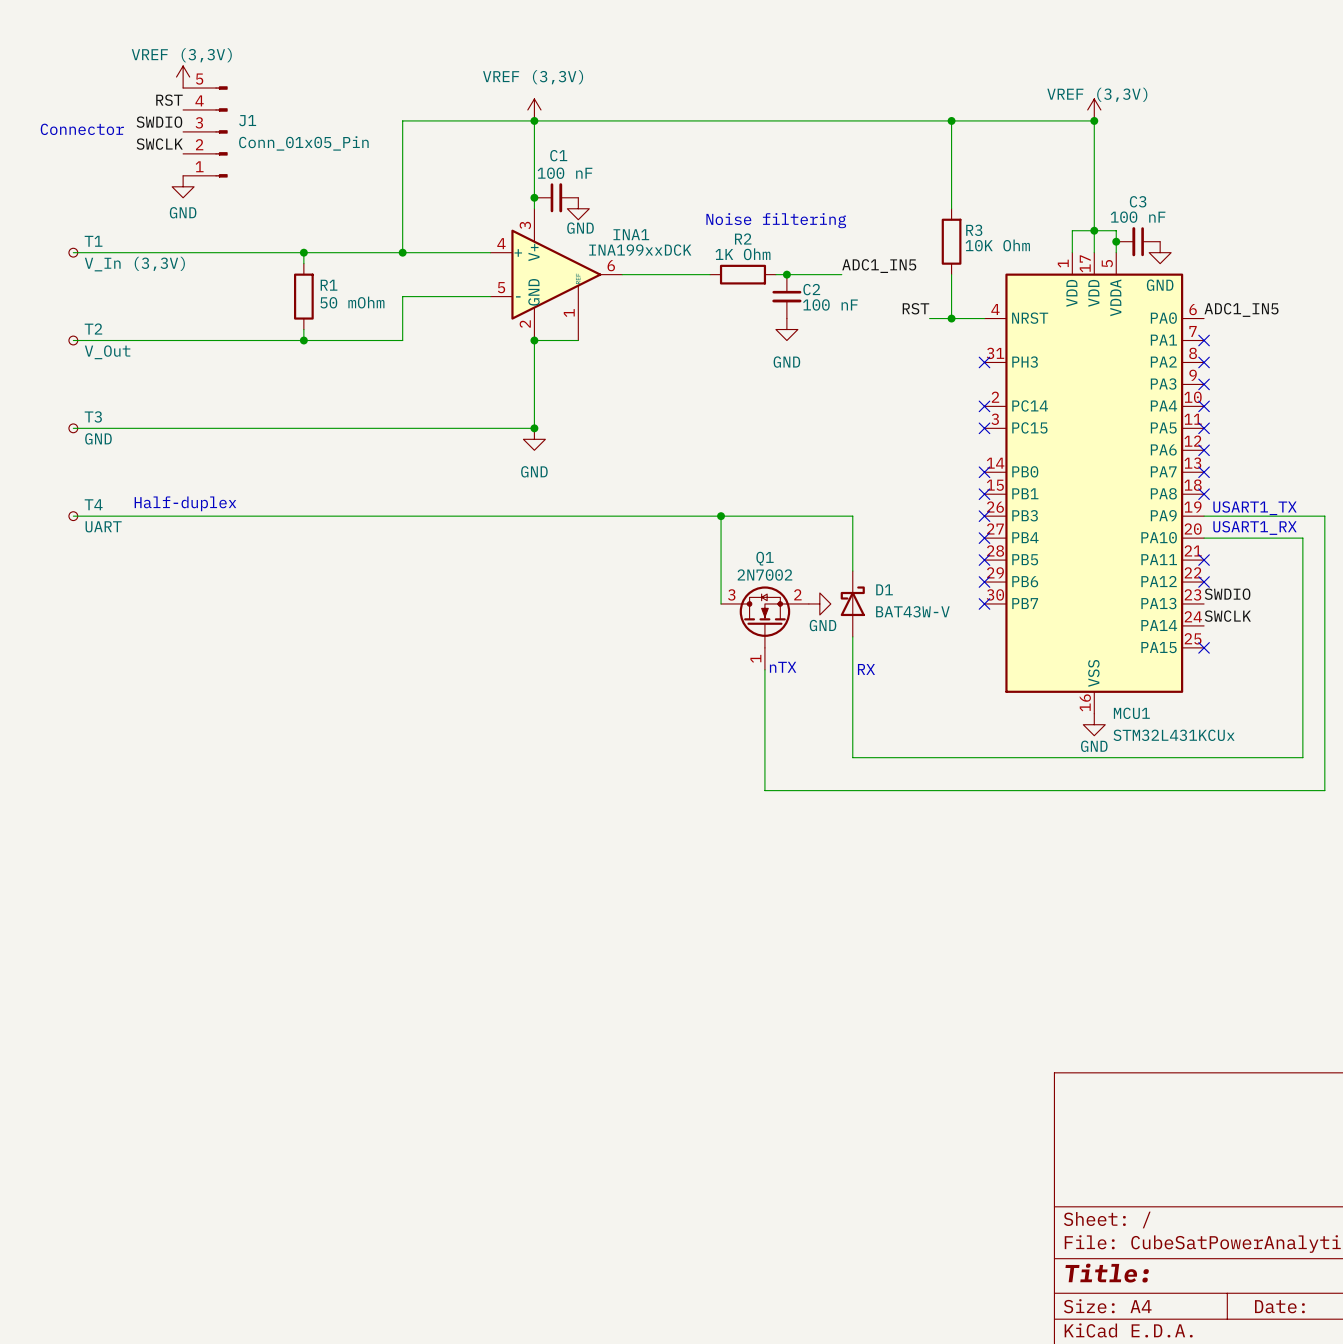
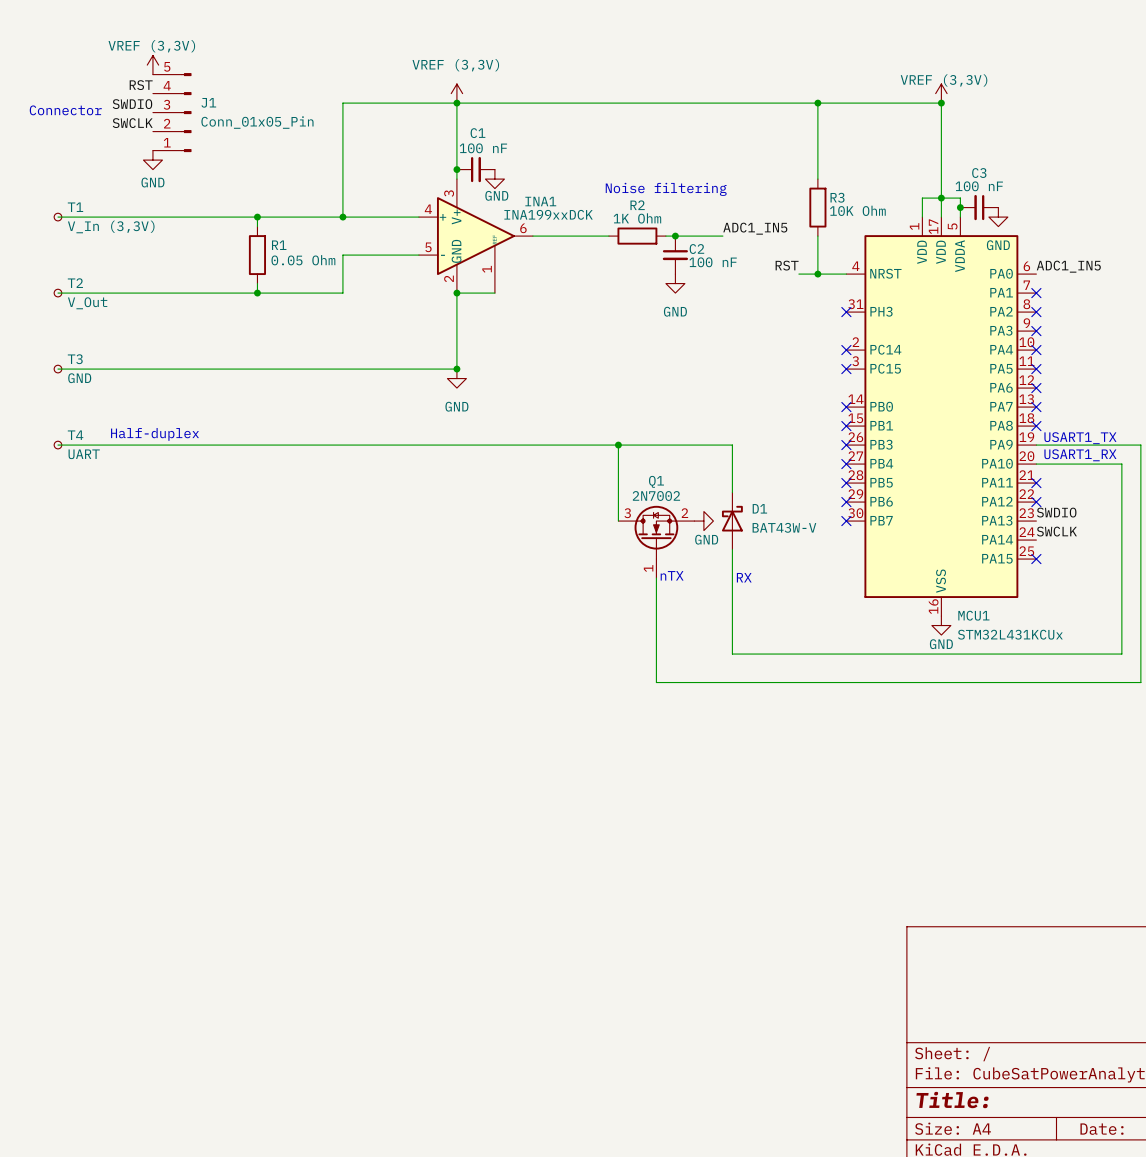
R1 value: 50 mOhm (352, 302) -> 0.05 Ohm (303, 260)

